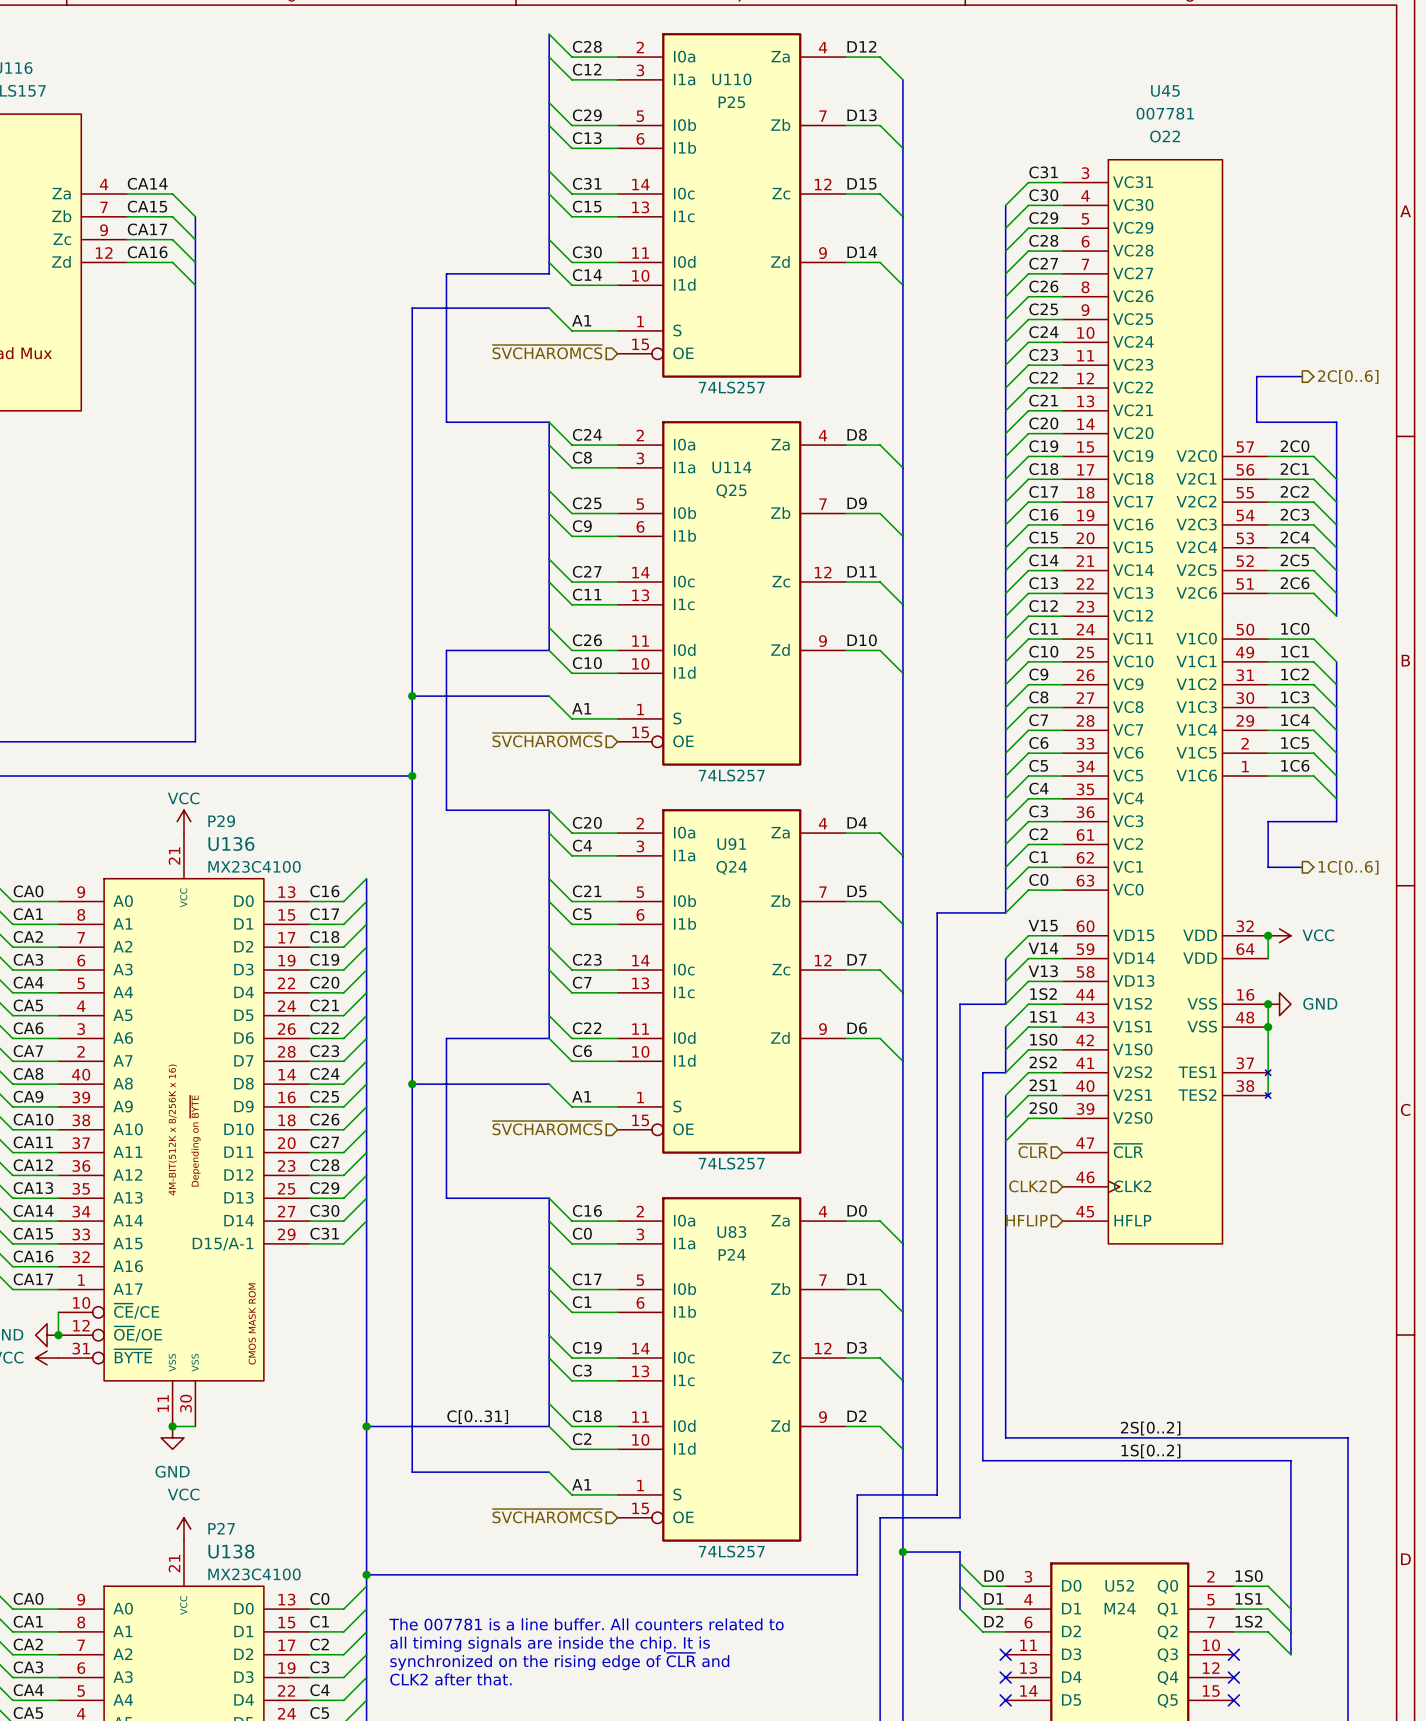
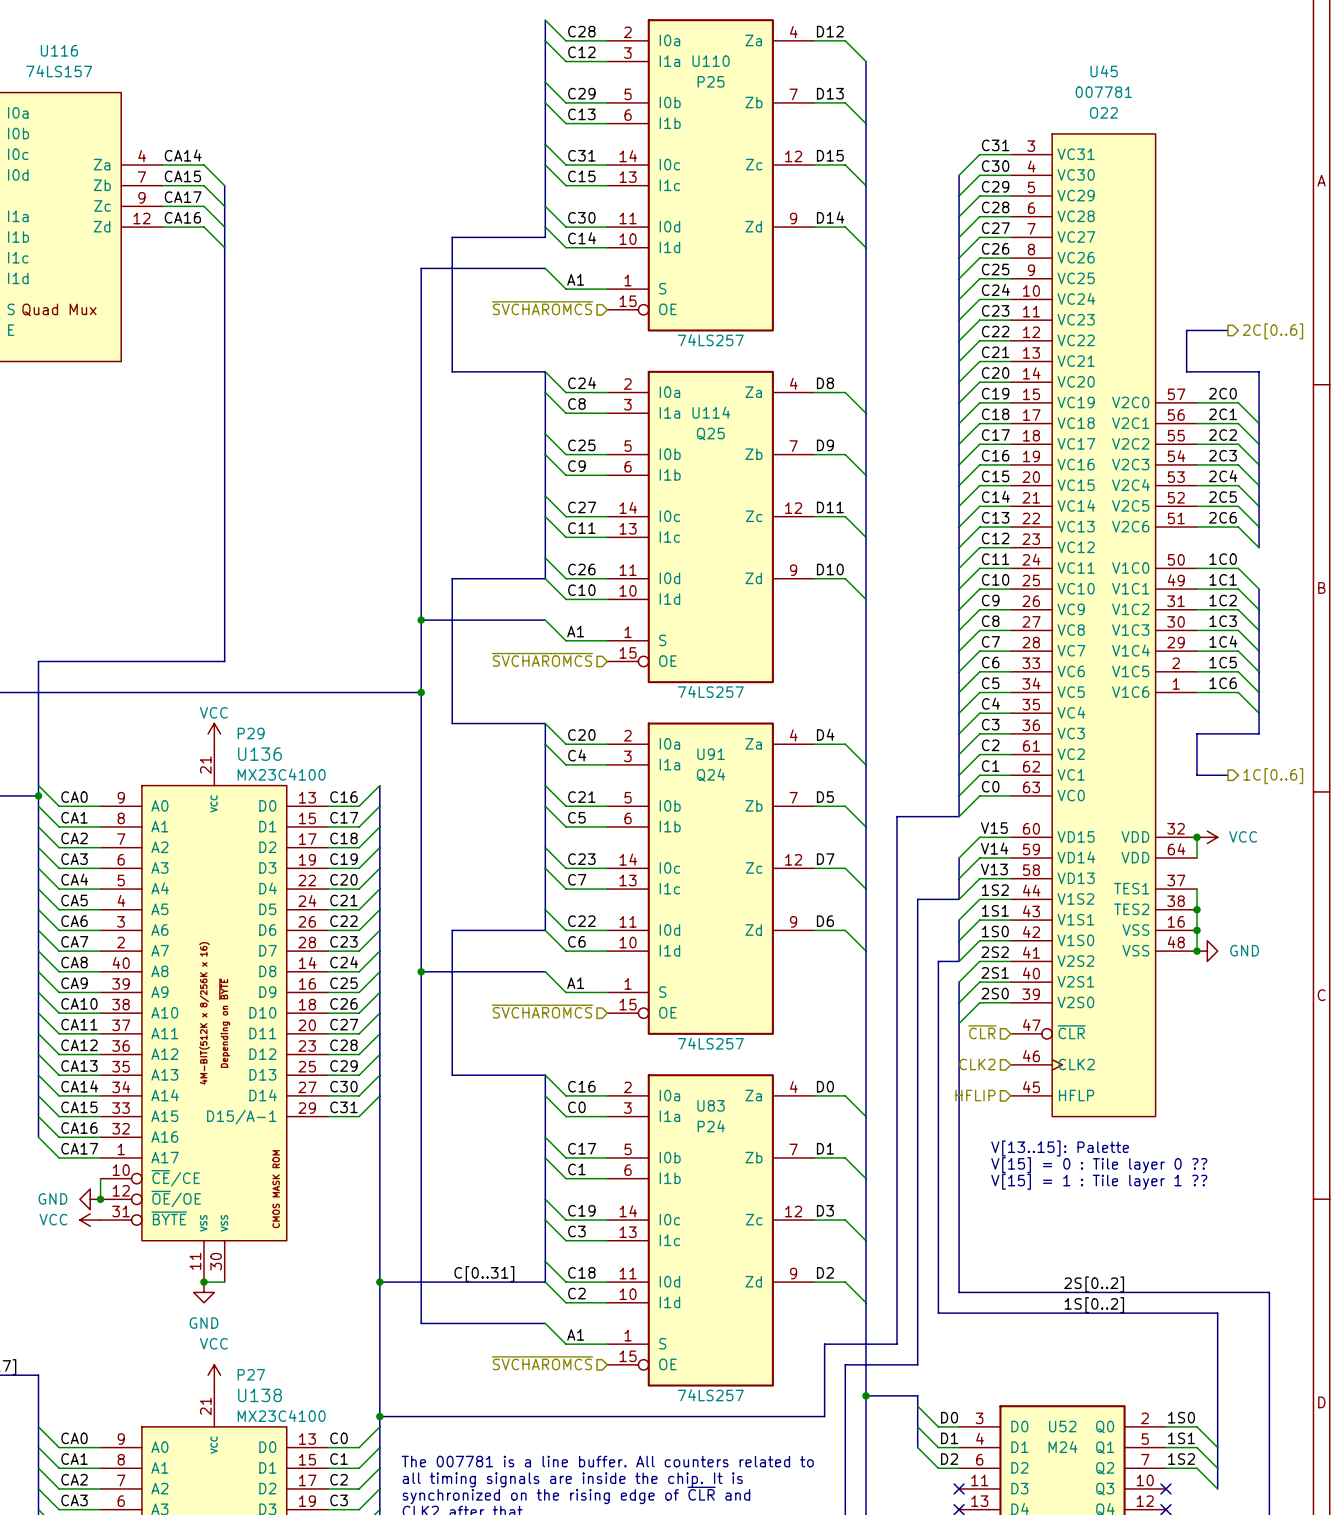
U45 symbol: [1062, 159, 1271, 1244] -> [1010, 133, 1197, 1117]
wire: none -> (1196, 889) (1196, 899)
junction: (1268, 1004) -> none
power symbol position: GND (1279, 1004) -> GND (1207, 951)
junction: none -> (1196, 909)
junction: (1268, 1027) -> none
junction: none -> (1196, 930)
wire: (1268, 1061) (1268, 1095) -> none
junction: none -> (1196, 951)
text: none -> V[13..15]: Palette (1060, 1148)
text: none -> V[15] = 0 : Tile layer 0 ?? (1099, 1165)
text: none -> V[15] = 1 : Tile layer 1 ?? (1099, 1181)

